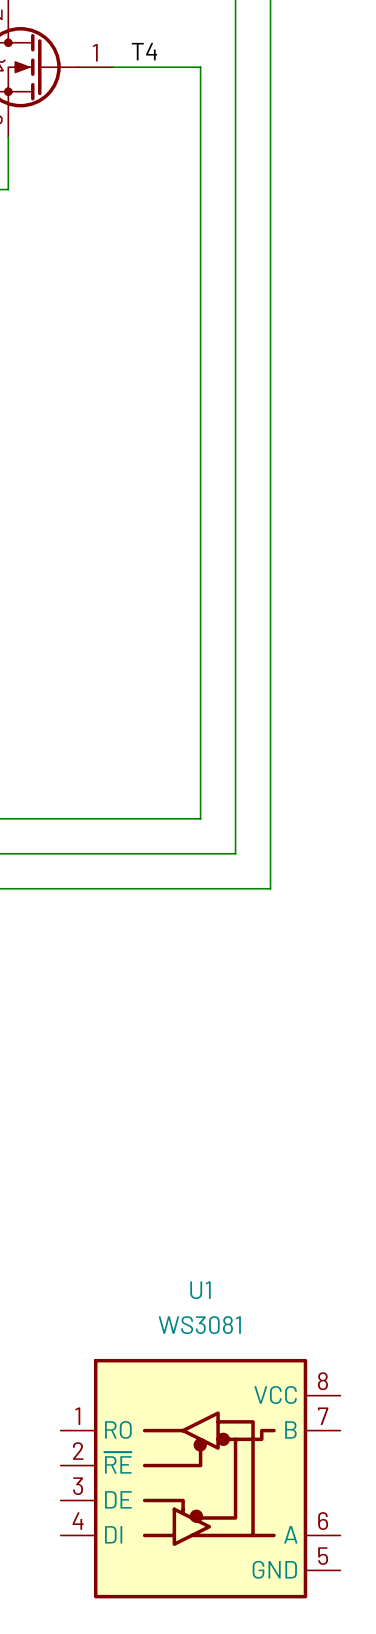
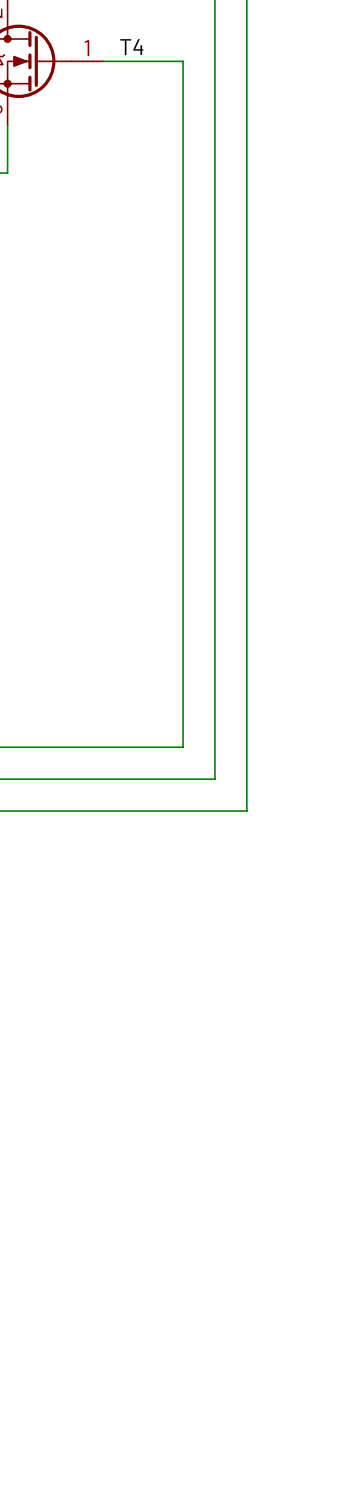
U1: WS3081 (200, 1478) -> none

